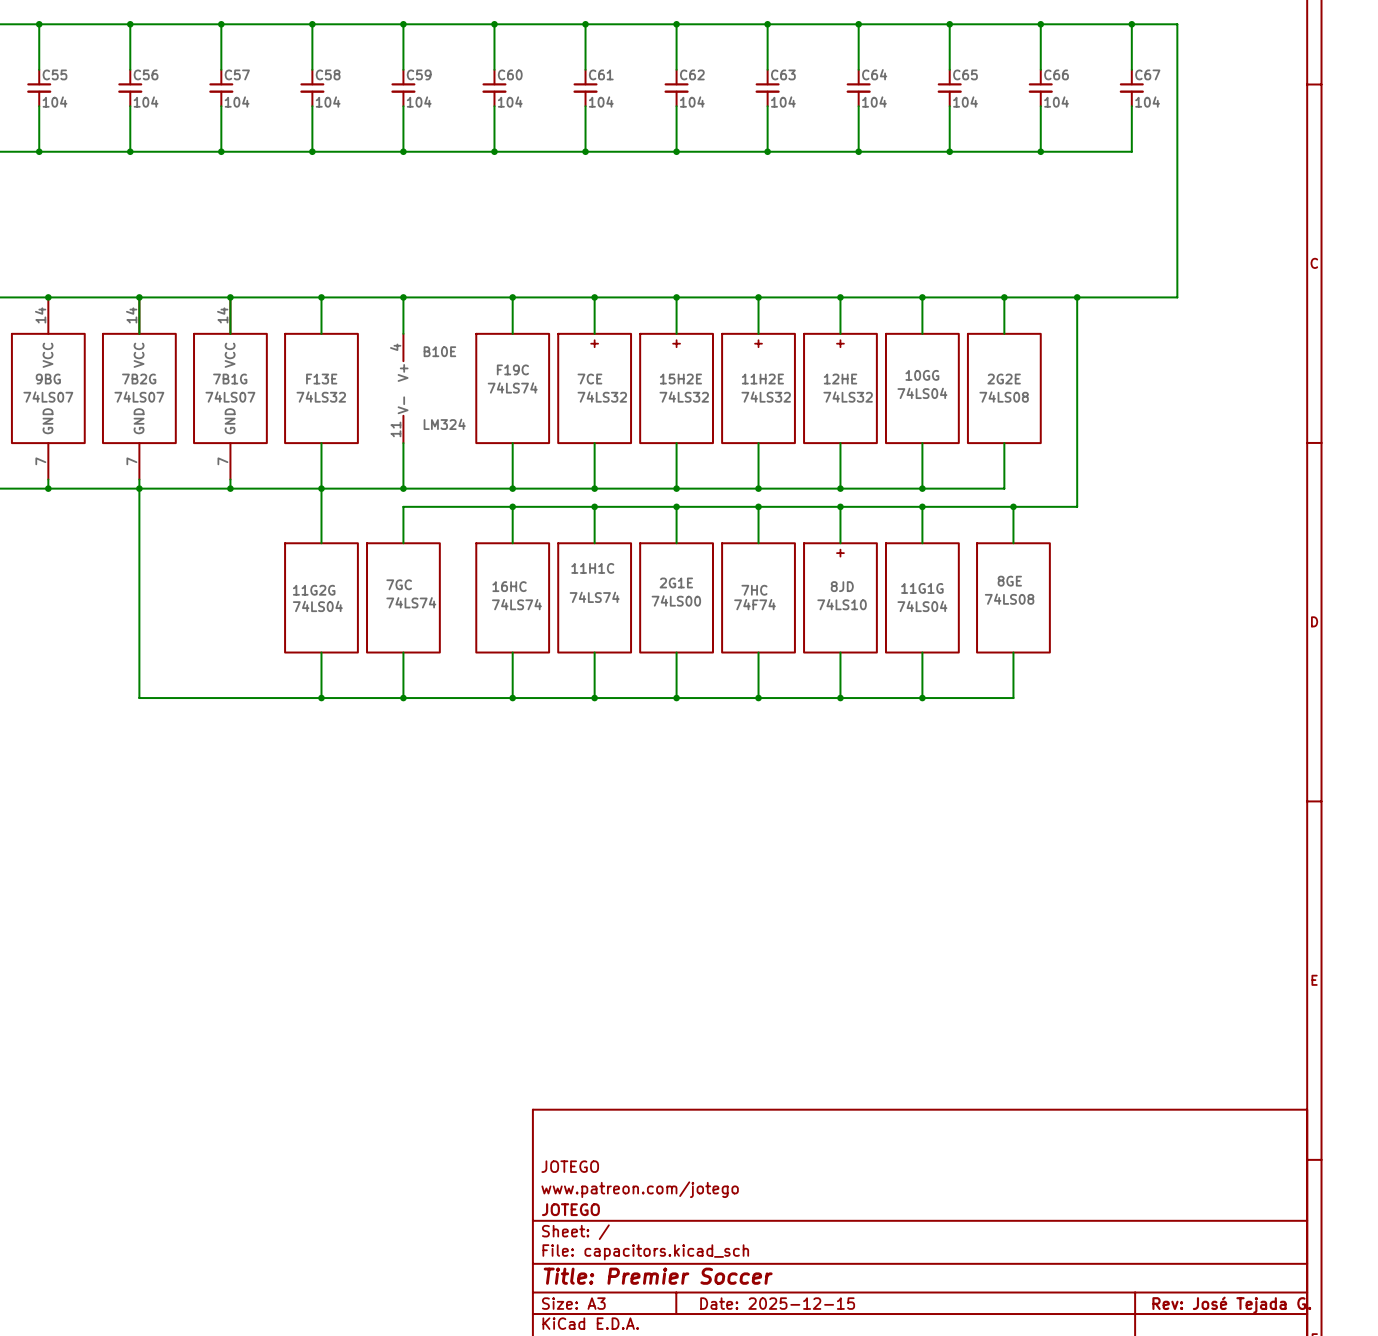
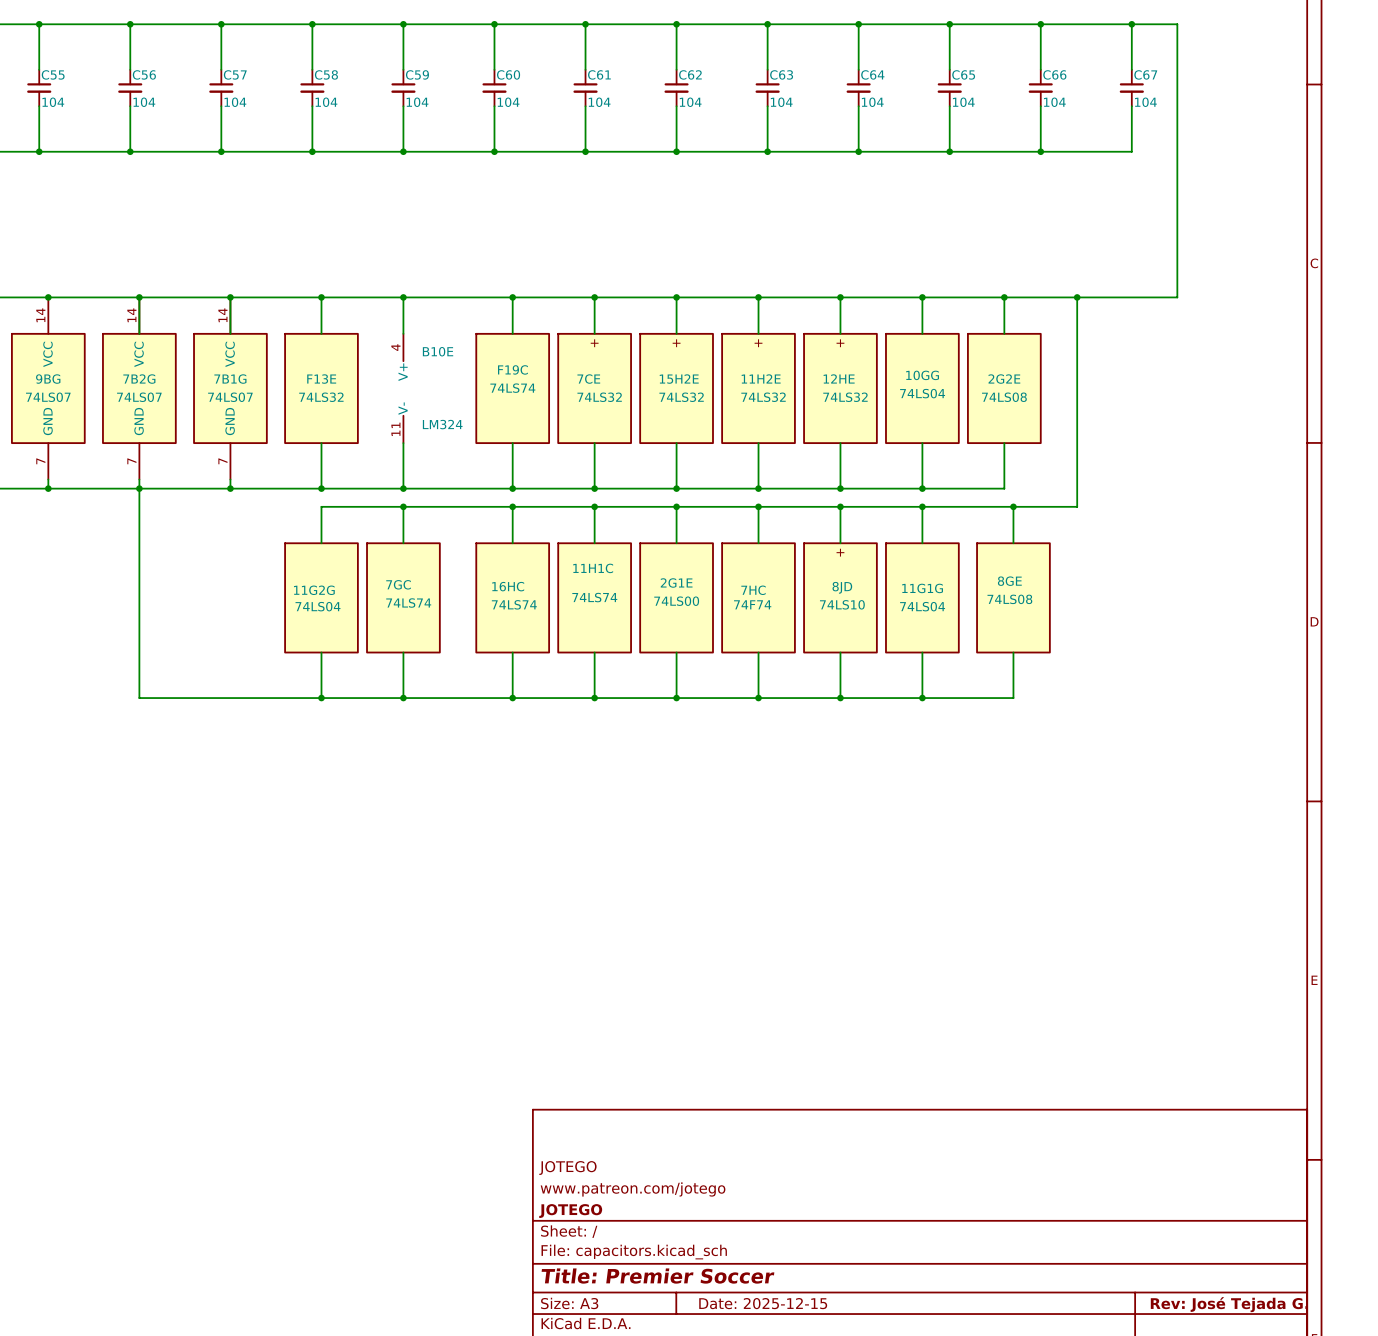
wire: (321, 488) (321, 506) -> (403, 506) (321, 506)
junction: none -> (403, 506)

